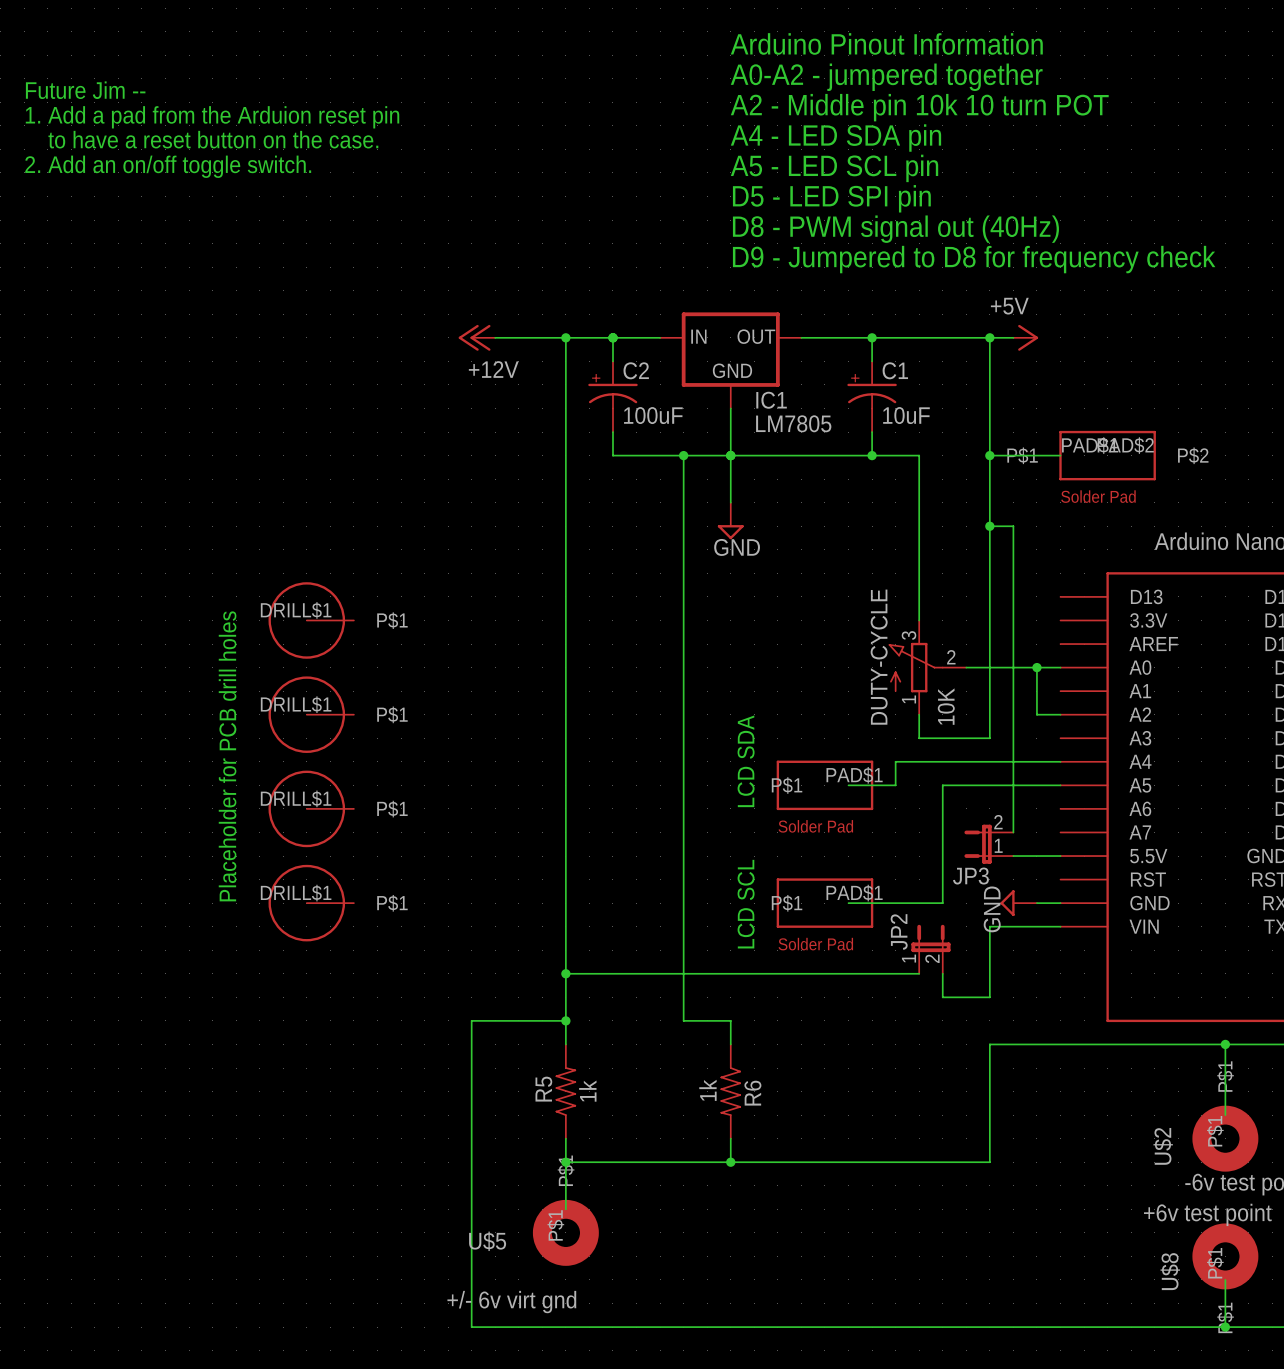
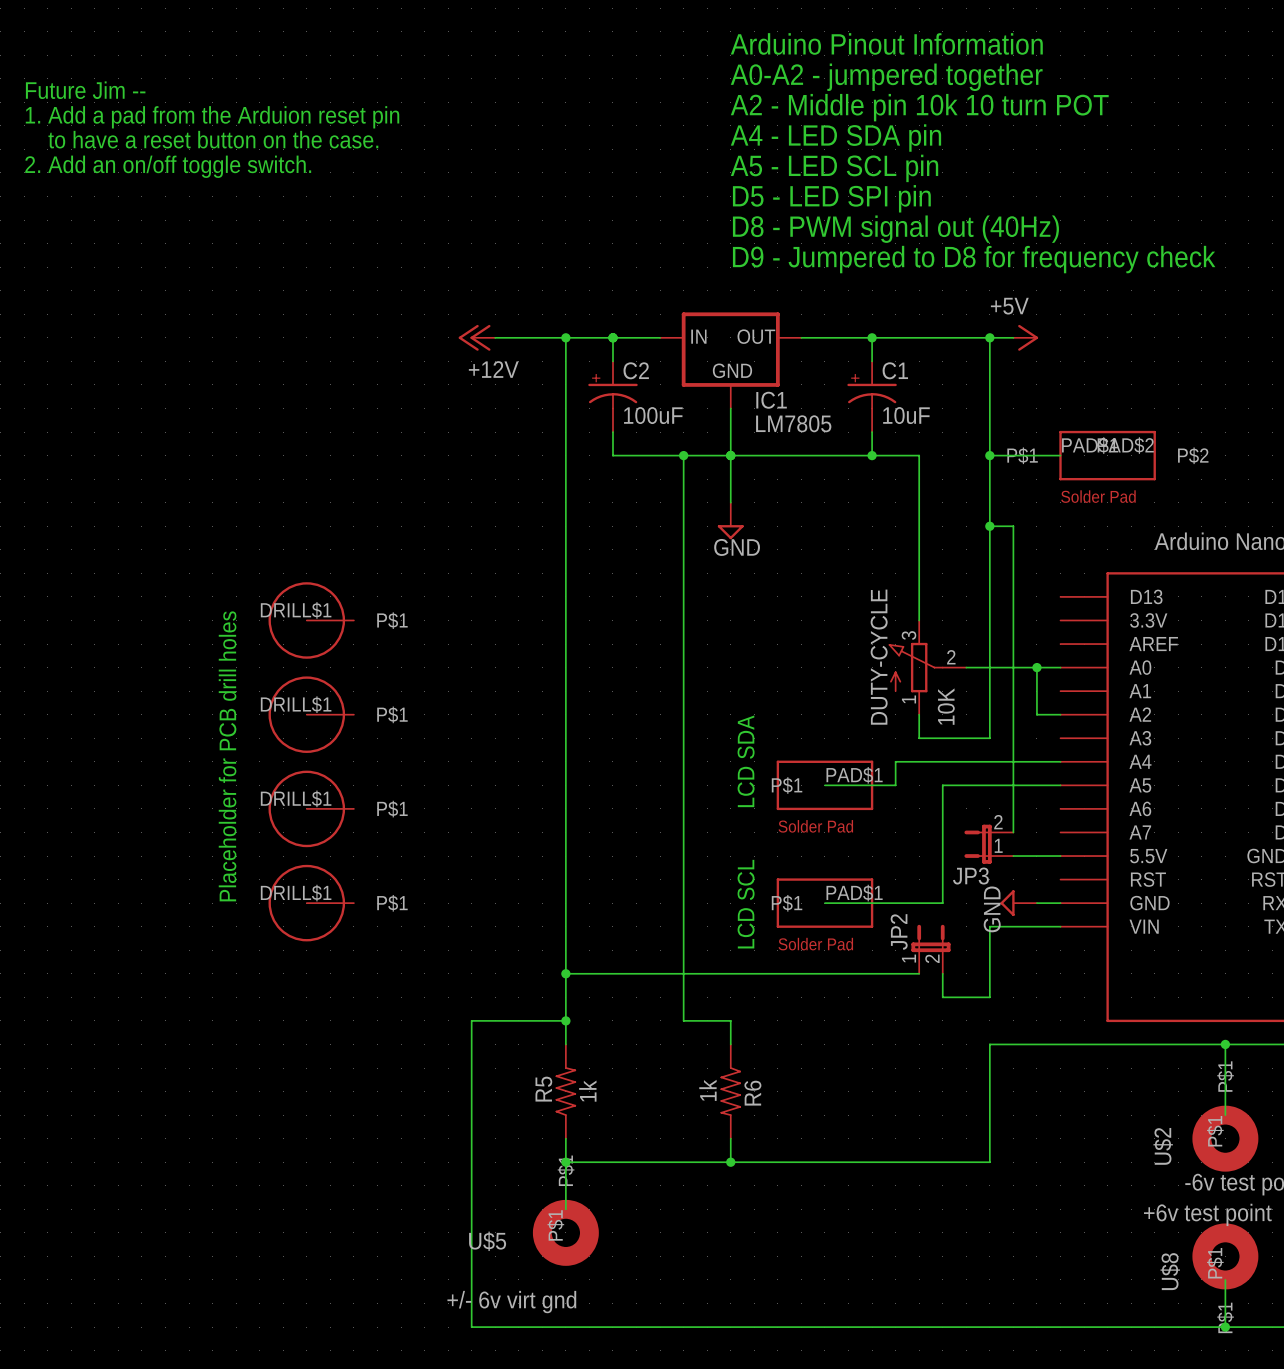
wire: none -> (824, 785) (848, 785)
wire: none -> (824, 903) (848, 903)

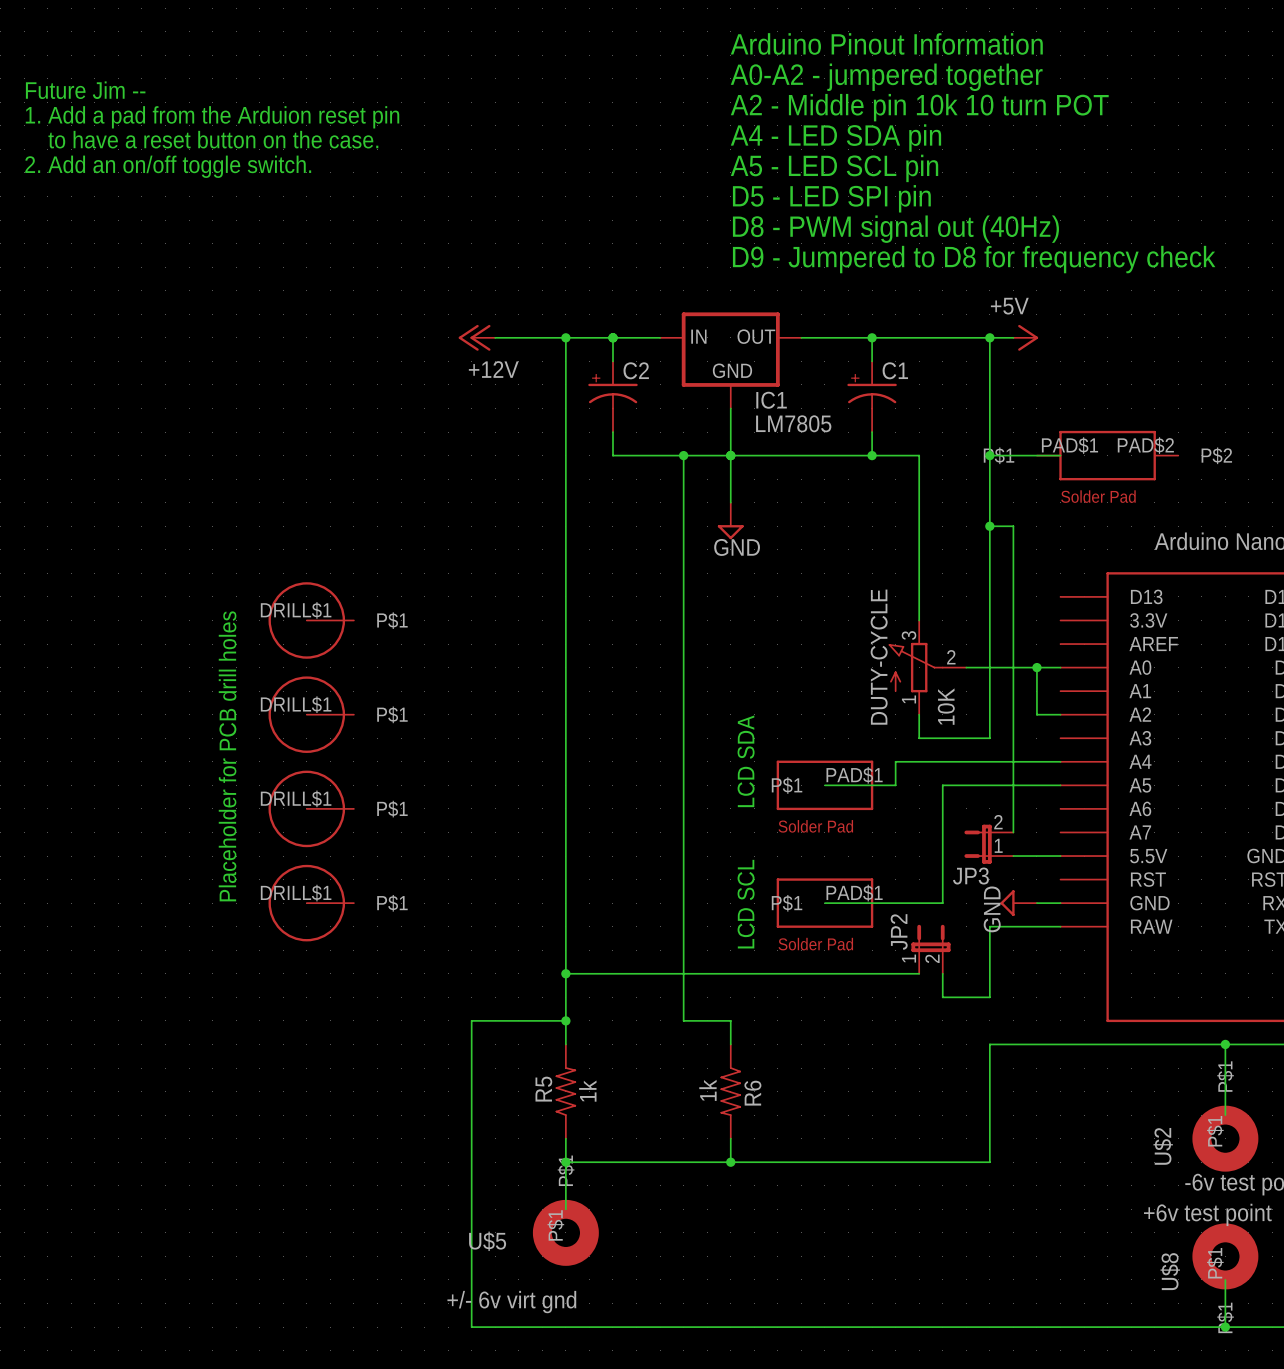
C2 value: 100uF (653, 415) -> none
C1 value: 10uF (906, 415) -> none
part symbol: [1059, 430, 1156, 481] -> [1036, 430, 1179, 481]
part pin name: VIN (1144, 926) -> RAW (1151, 926)

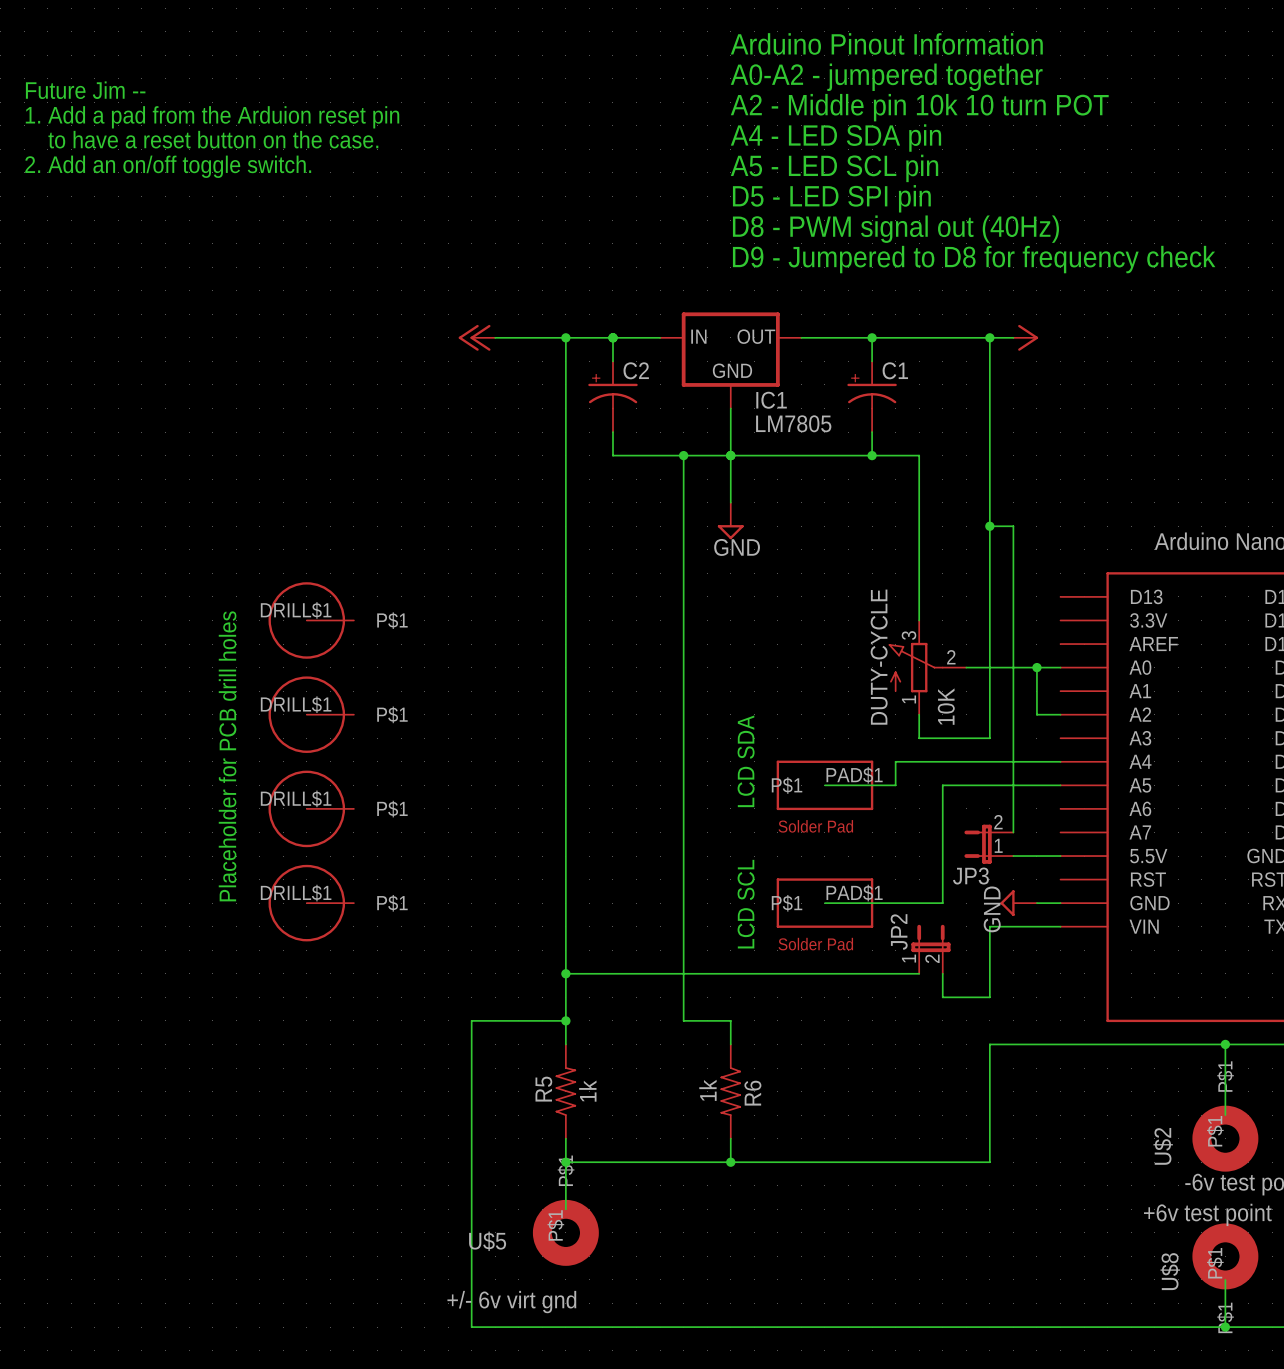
part value: +5V (1009, 306) -> none
part value: +12V (493, 369) -> none
wire: (989, 455) (1060, 455) -> none
junction: (989, 455) -> none
part: (1107, 455) -> none
part pin name: RAW (1151, 926) -> VIN (1144, 926)

